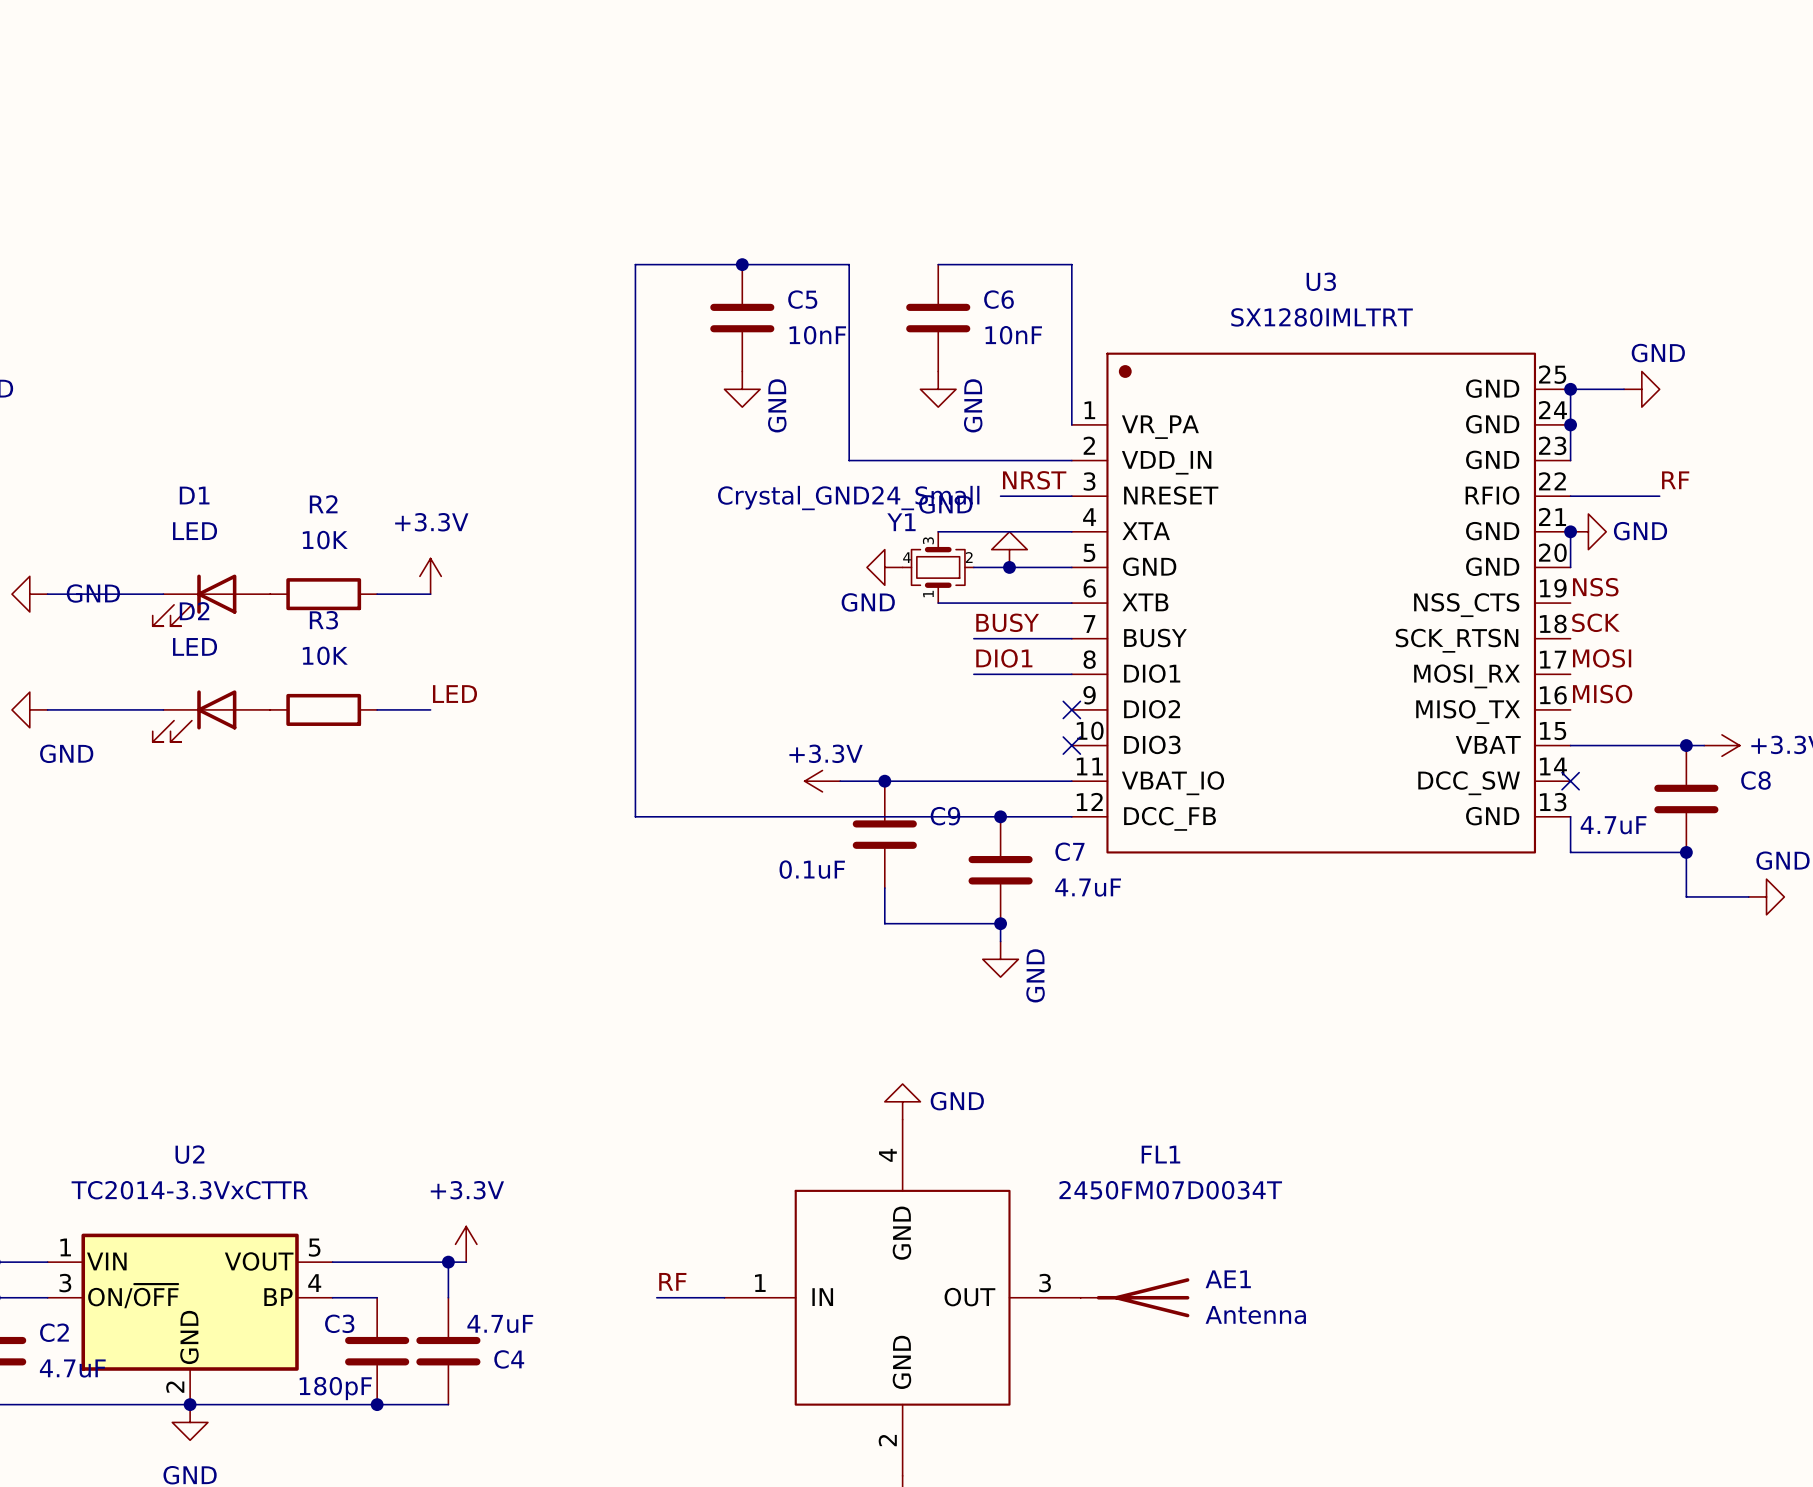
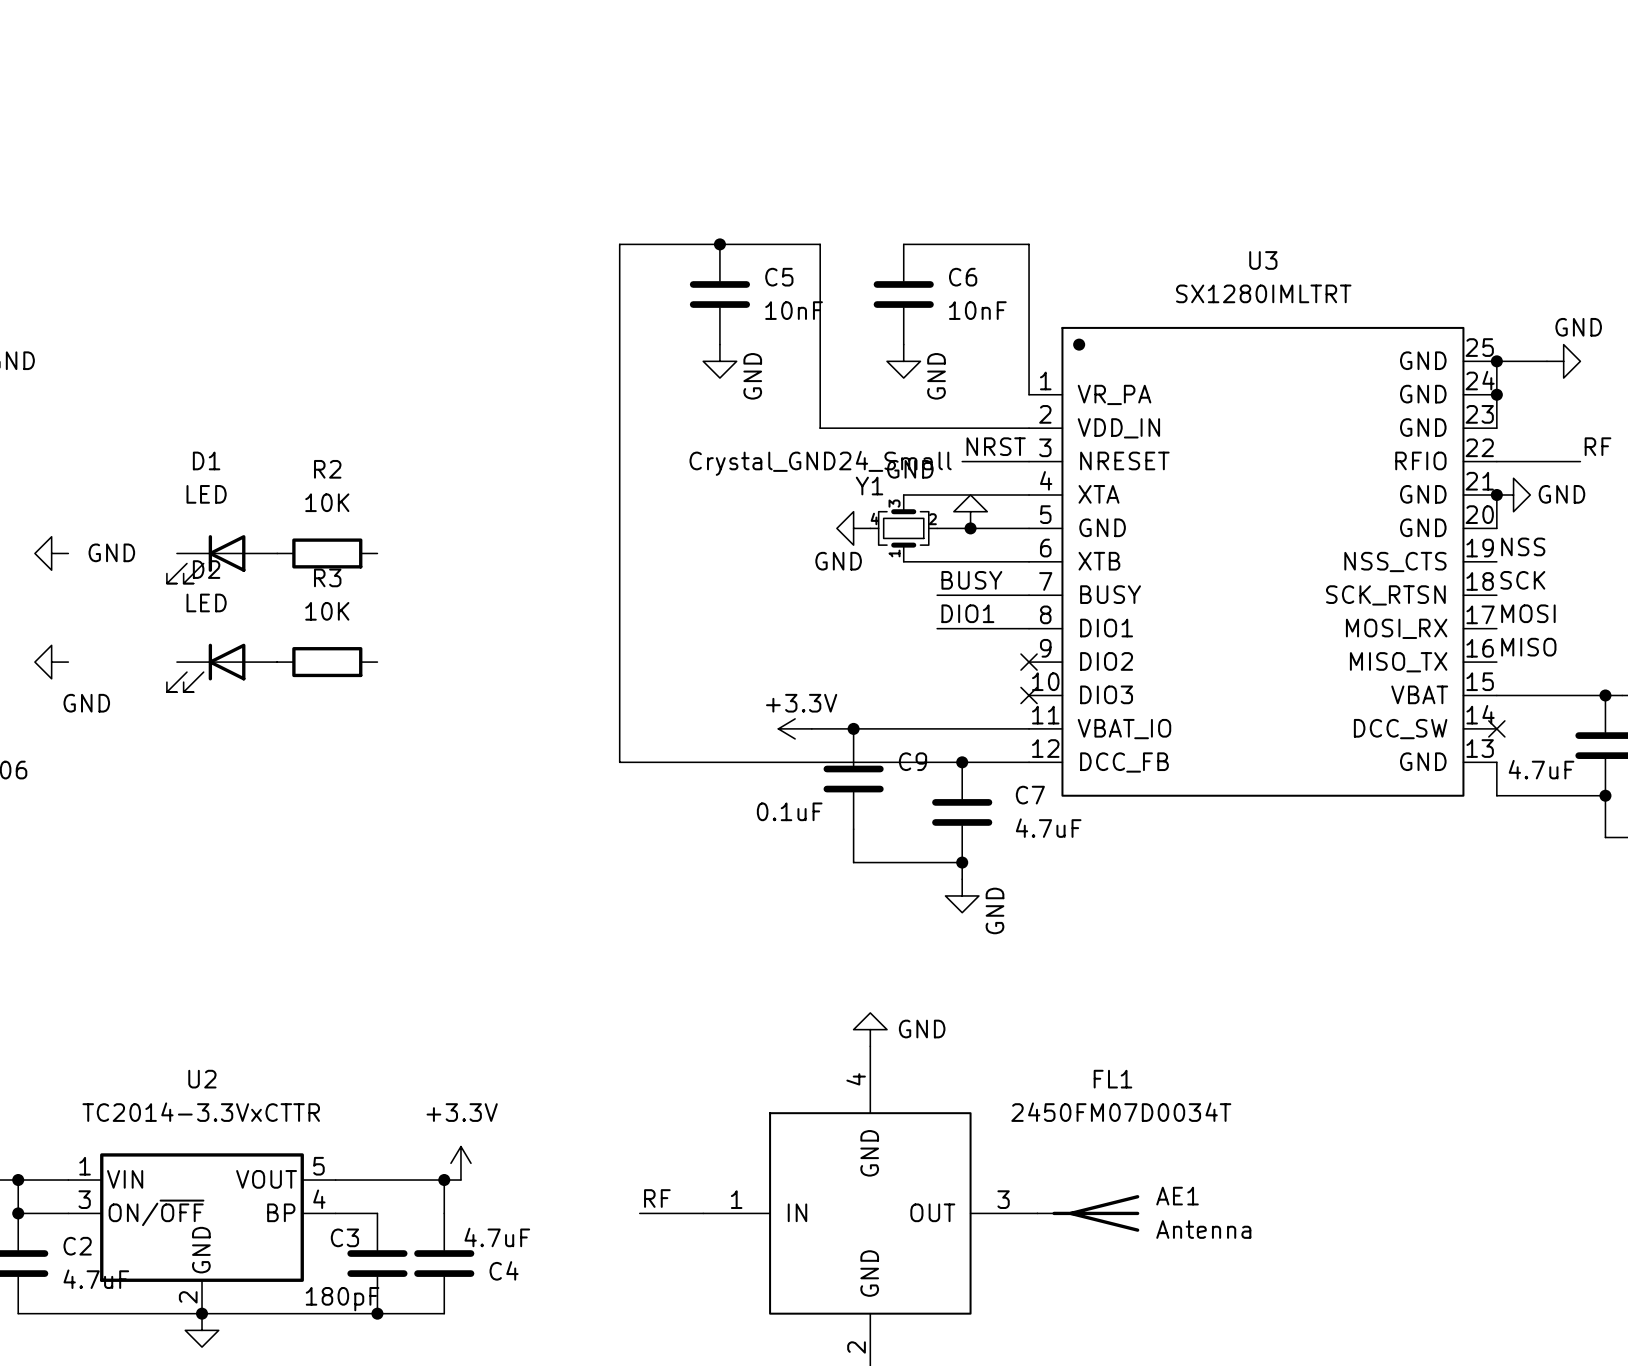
power symbol: +3.3V (430, 576) -> none
wire: (47, 594) (163, 594) -> none
wire: (377, 594) (430, 594) -> none
label: LED (454, 694) -> none
wire: (47, 709) (163, 709) -> none
wire: (377, 709) (430, 709) -> none

